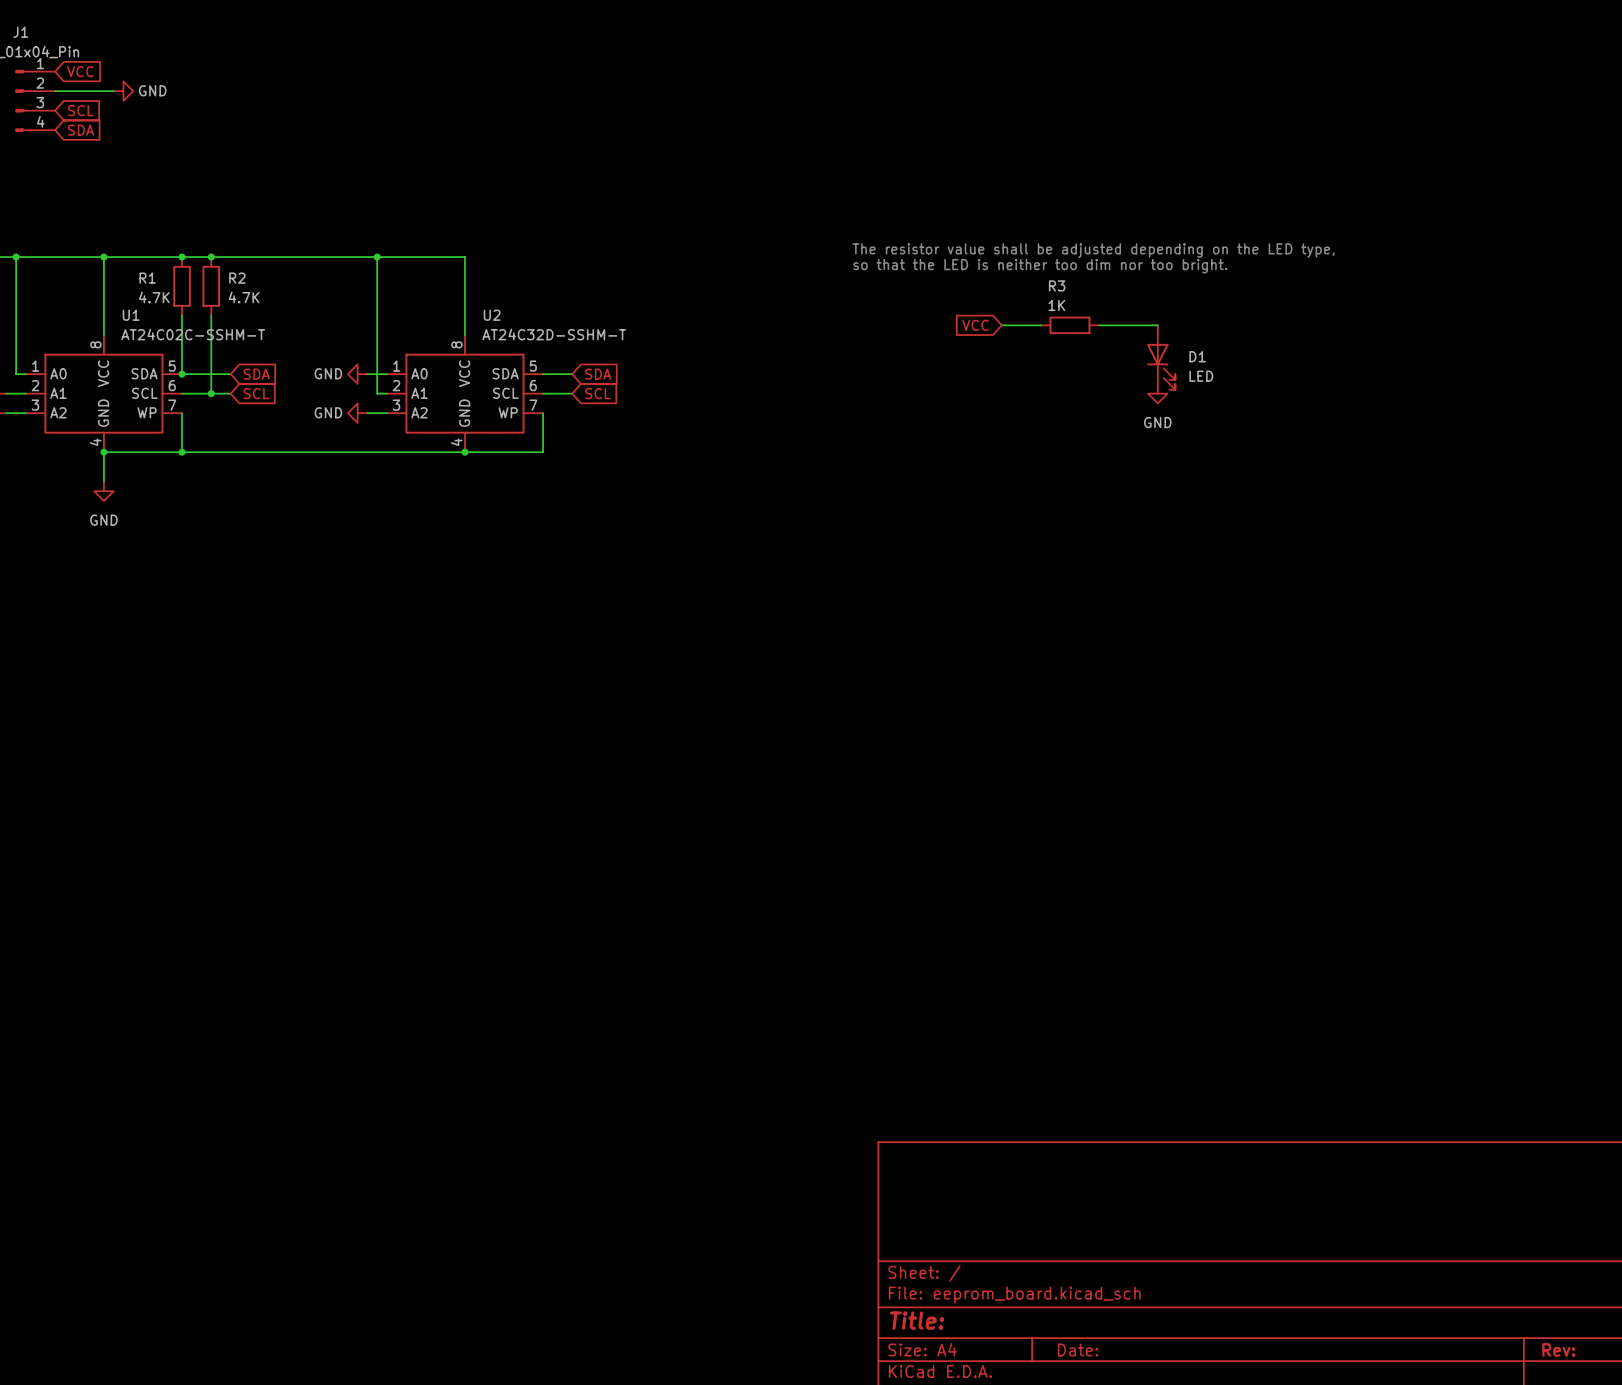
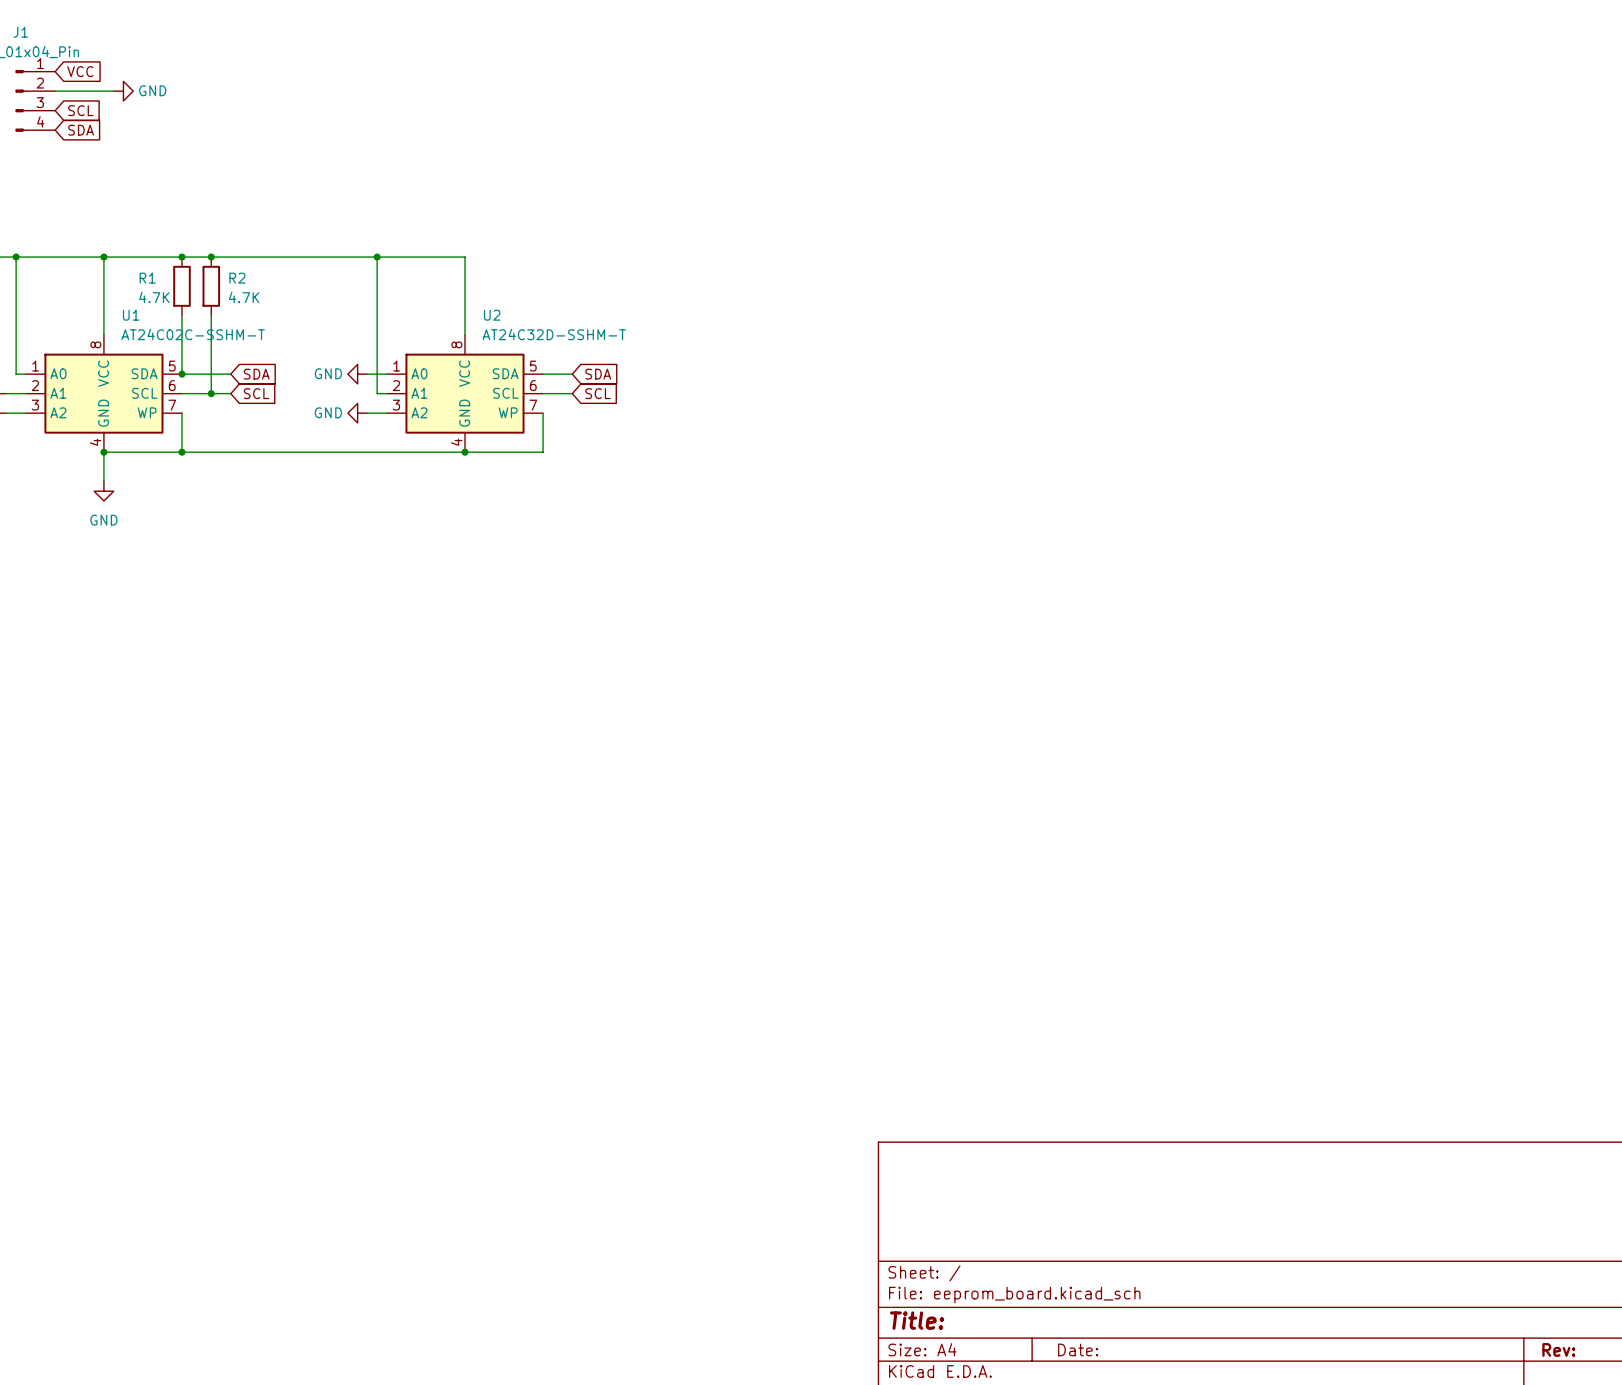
text: The resistor value shall be adjusted depending on the LED type, (1093, 250) -> none
text: so that the LED is neither too dim nor too bright. (1040, 266) -> none
global label: VCC (975, 325) -> none
wire: (1001, 325) (1040, 325) -> none
R3: 1K (1069, 325) -> none
wire: (1099, 325) (1157, 325) -> none
D1: LED (1161, 357) -> none
power symbol: GND (1157, 393) -> none

